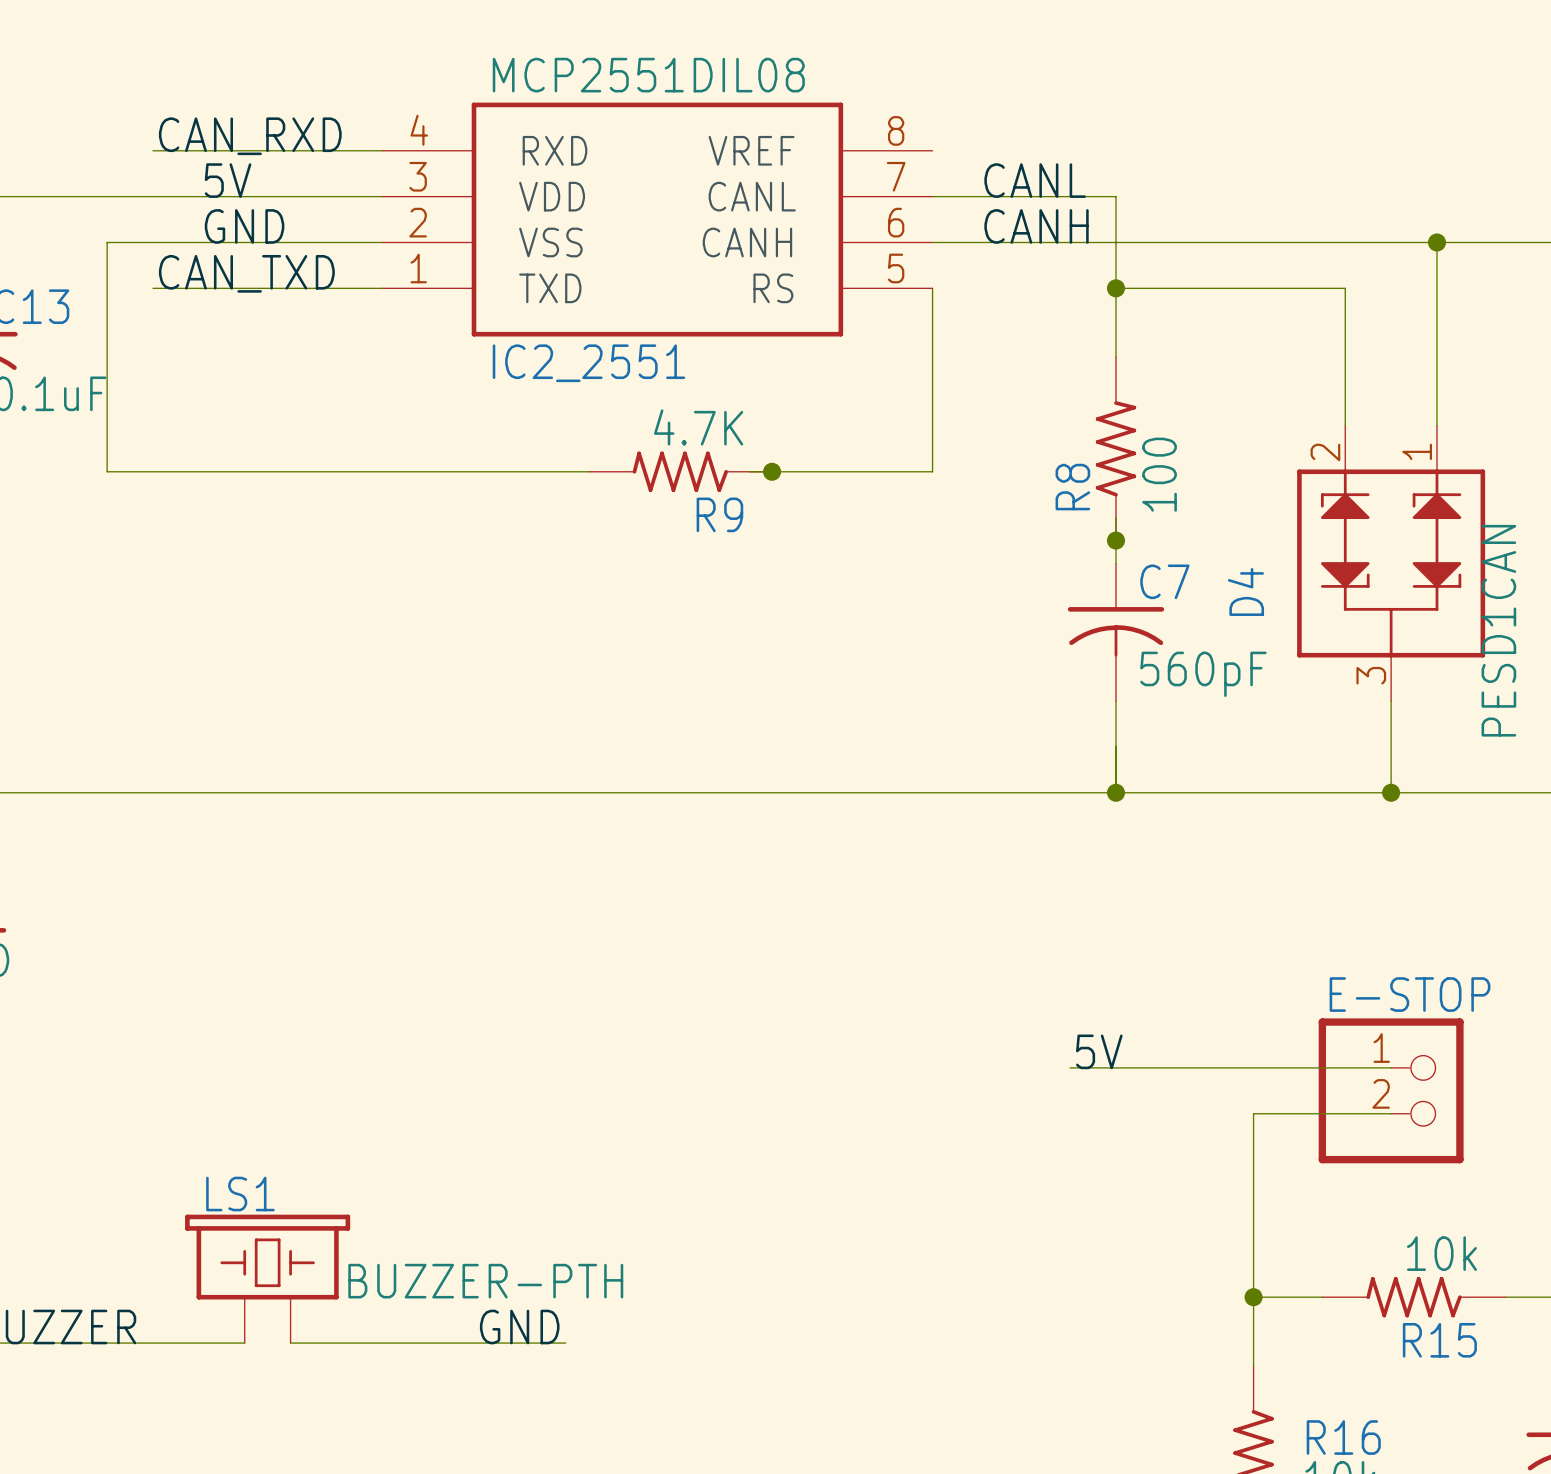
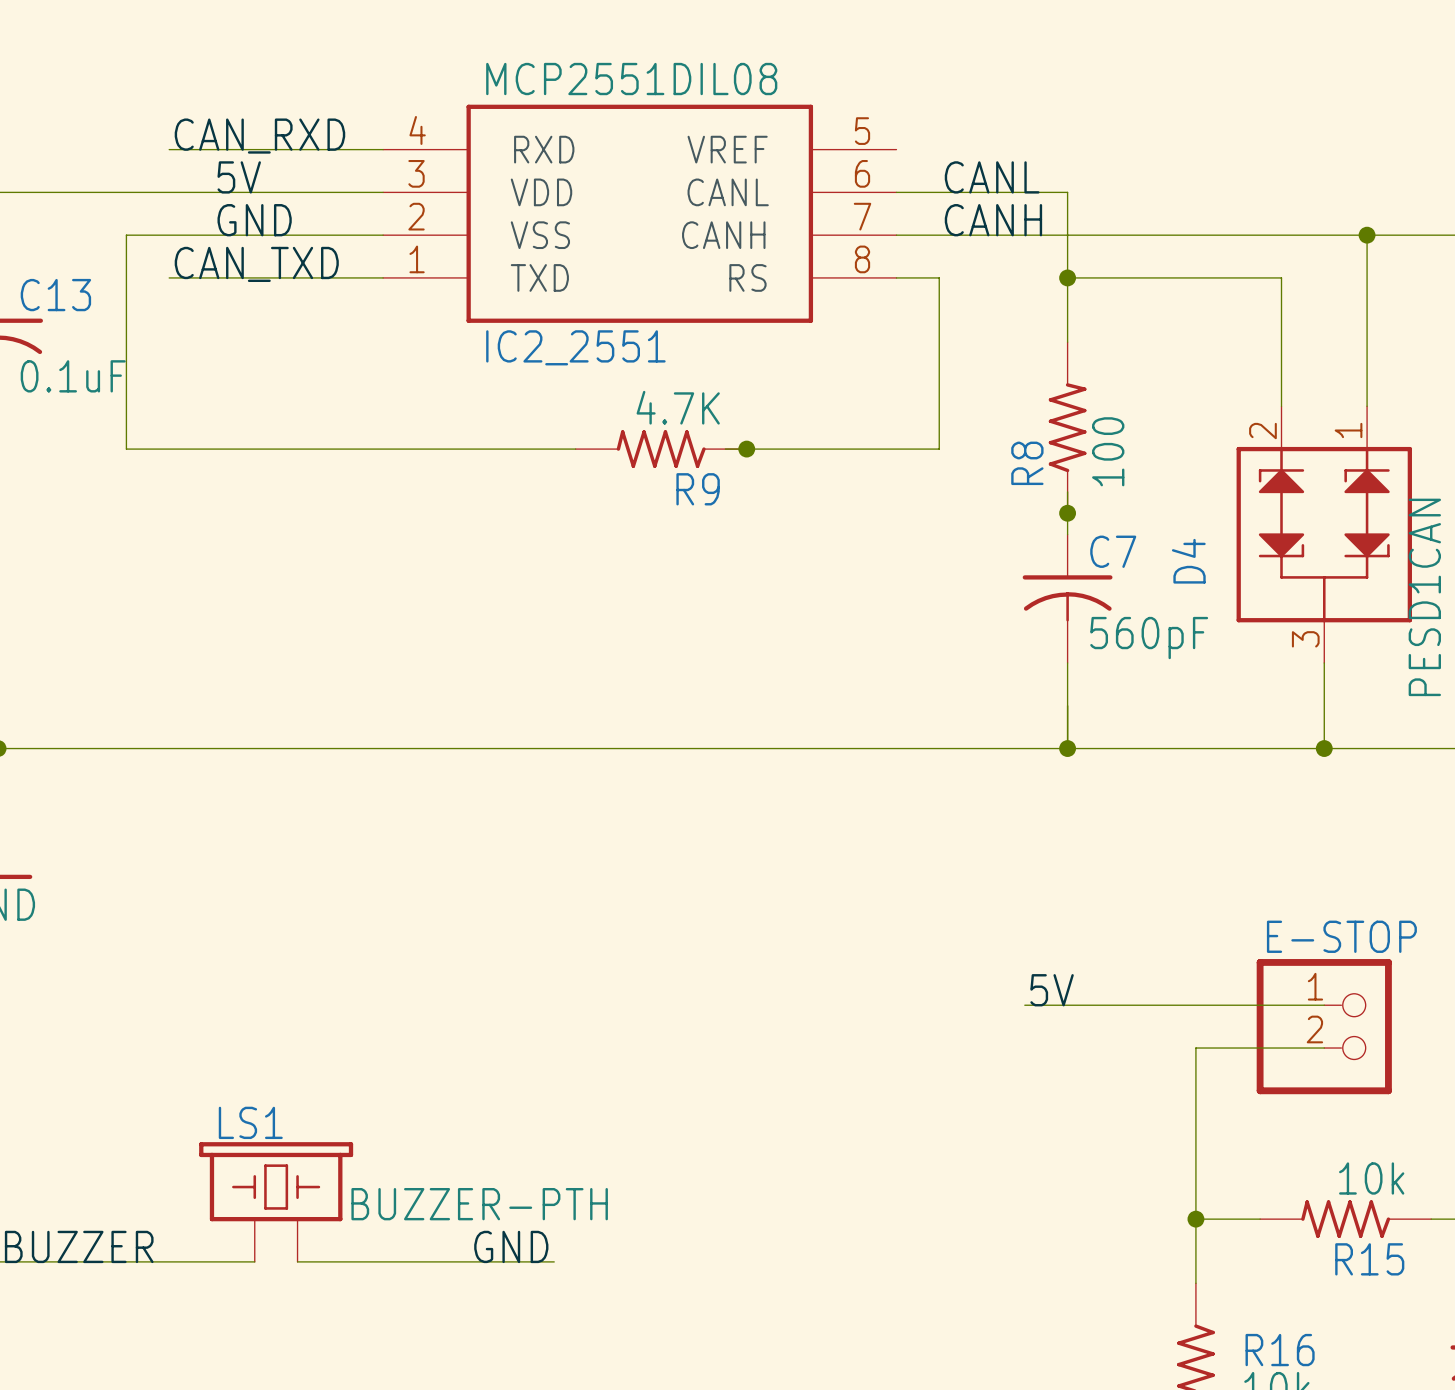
IC2_2551 pin number: 8 (896, 130) -> 5 (862, 131)
IC2_2551 pin number: 7 (896, 176) -> 6 (862, 173)
IC2_2551 pin number: 6 (896, 222) -> 7 (862, 216)
IC2_2551 pin number: 5 (896, 268) -> 8 (862, 259)
wire: (932, 288) (932, 471) -> (896, 277) (939, 277) (939, 449) (896, 449)

